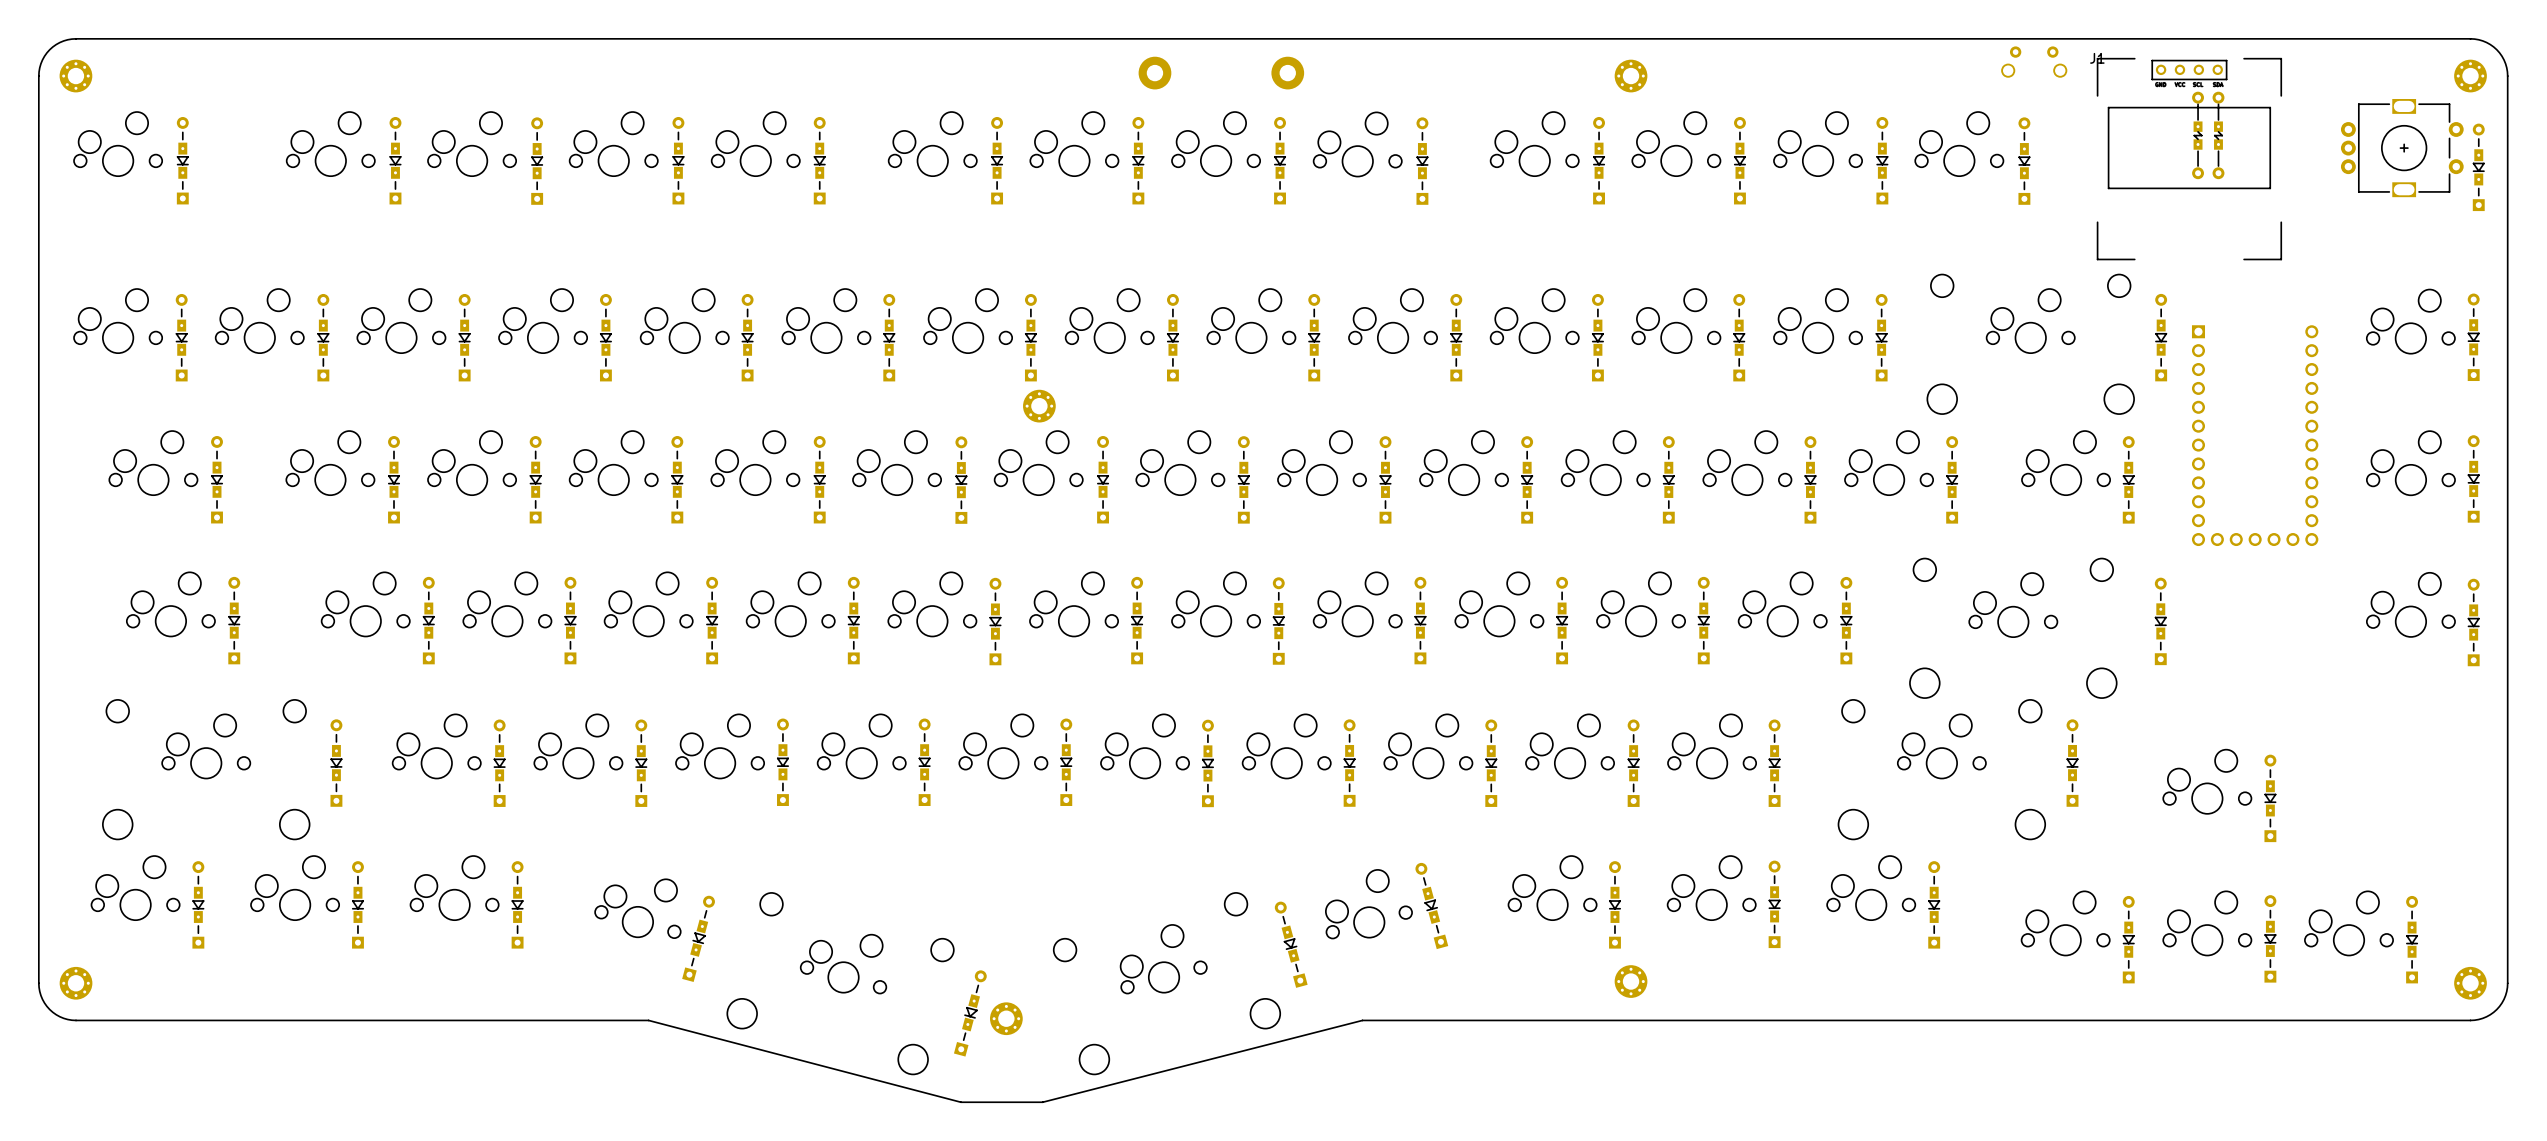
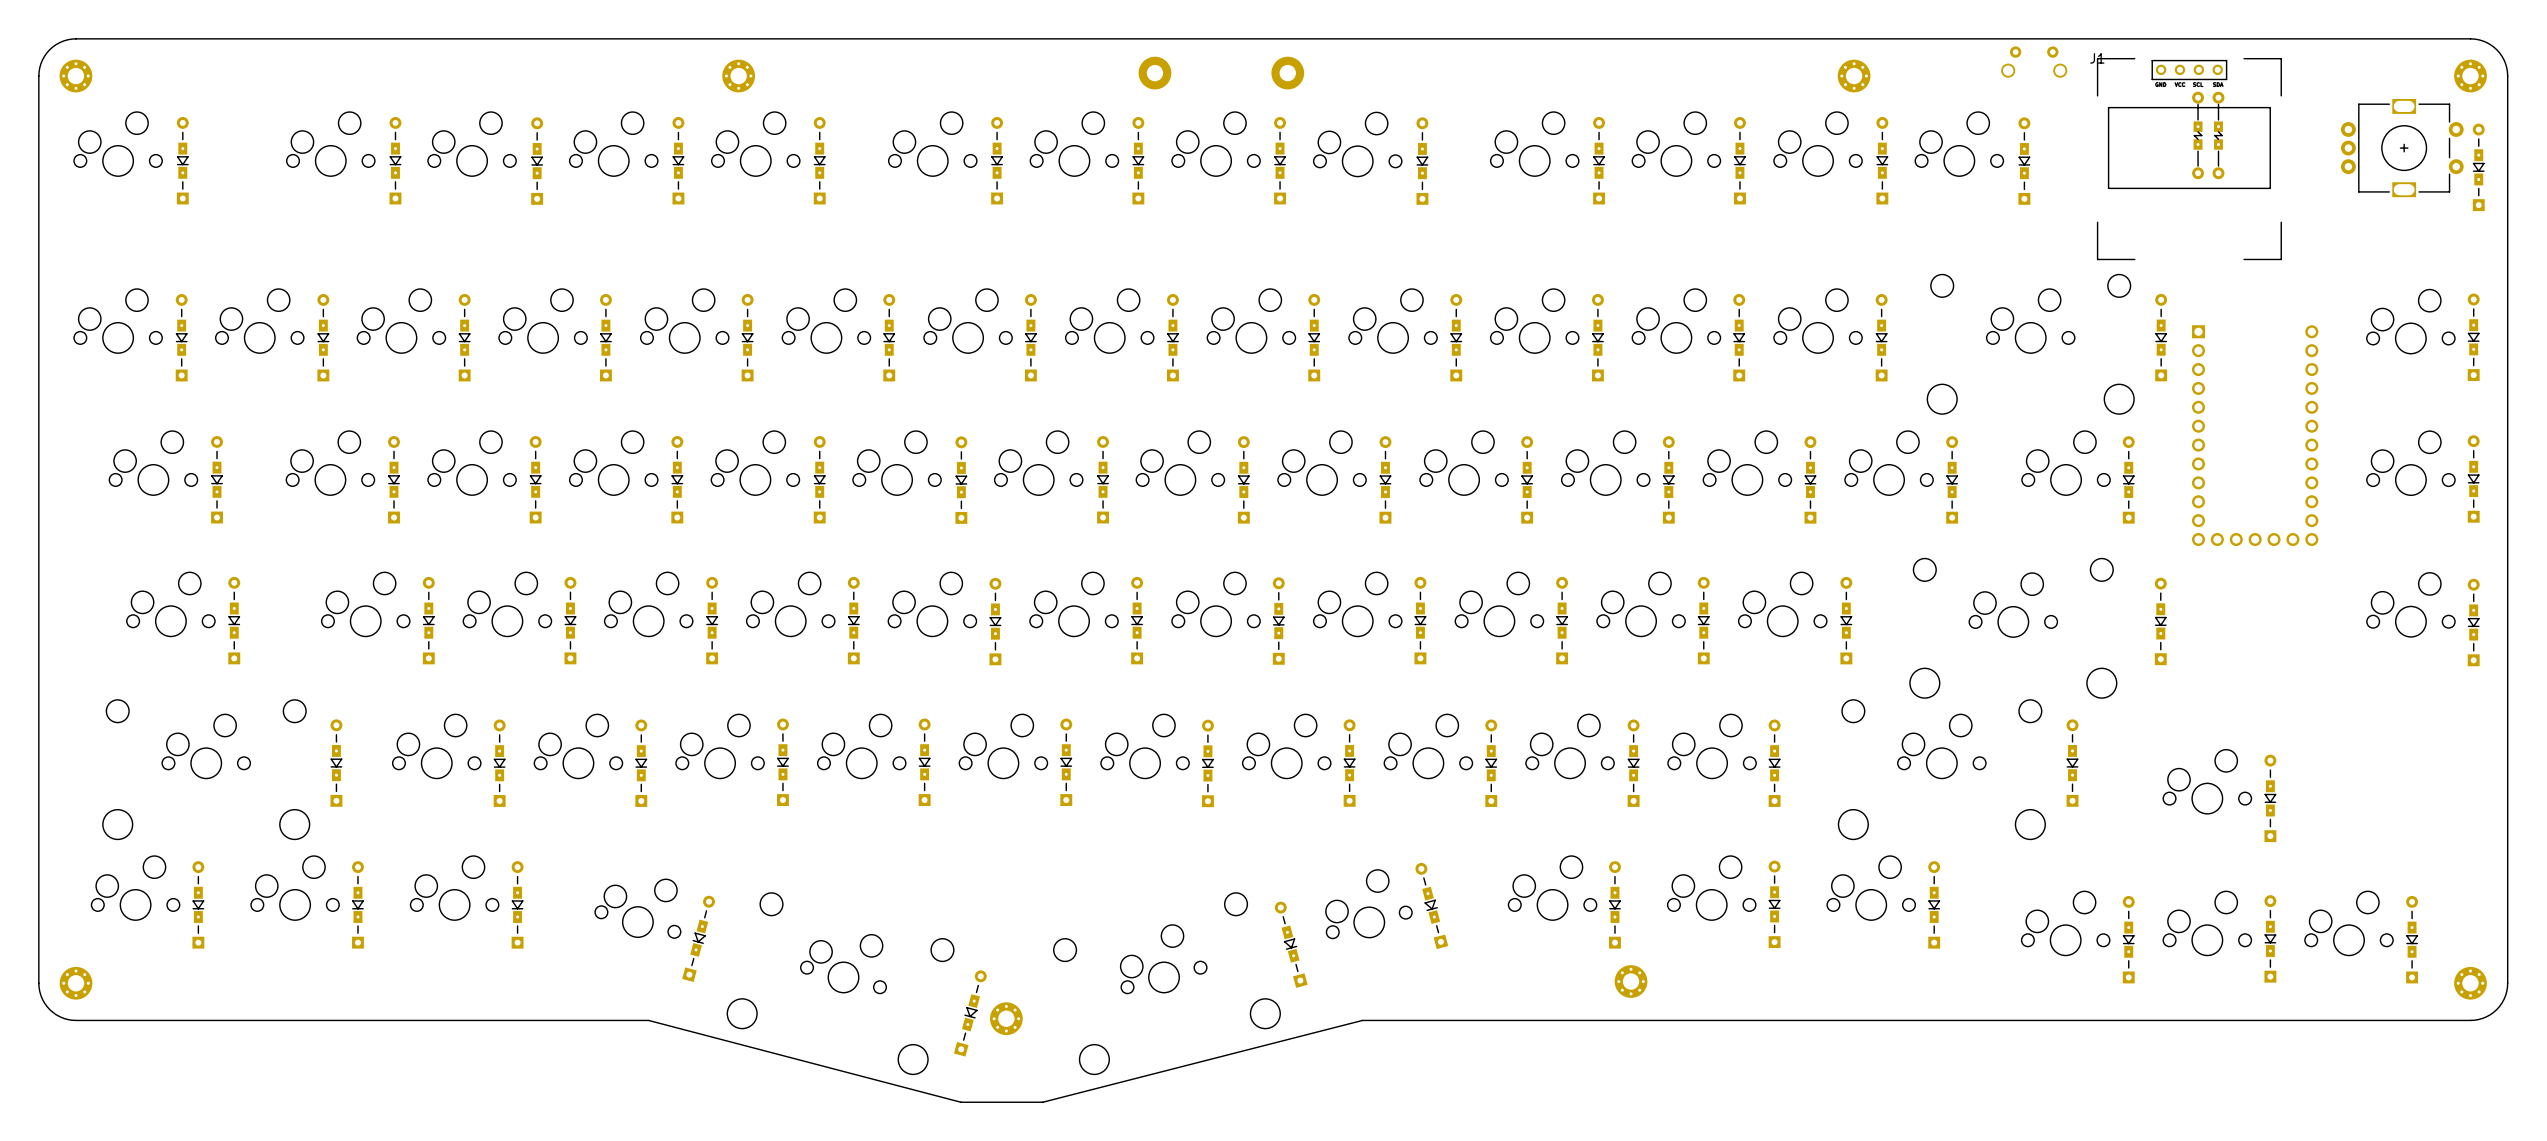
part: none -> (738, 76)
part: (1631, 76) -> none
part: none -> (1854, 76)
part: (1039, 406) -> none

